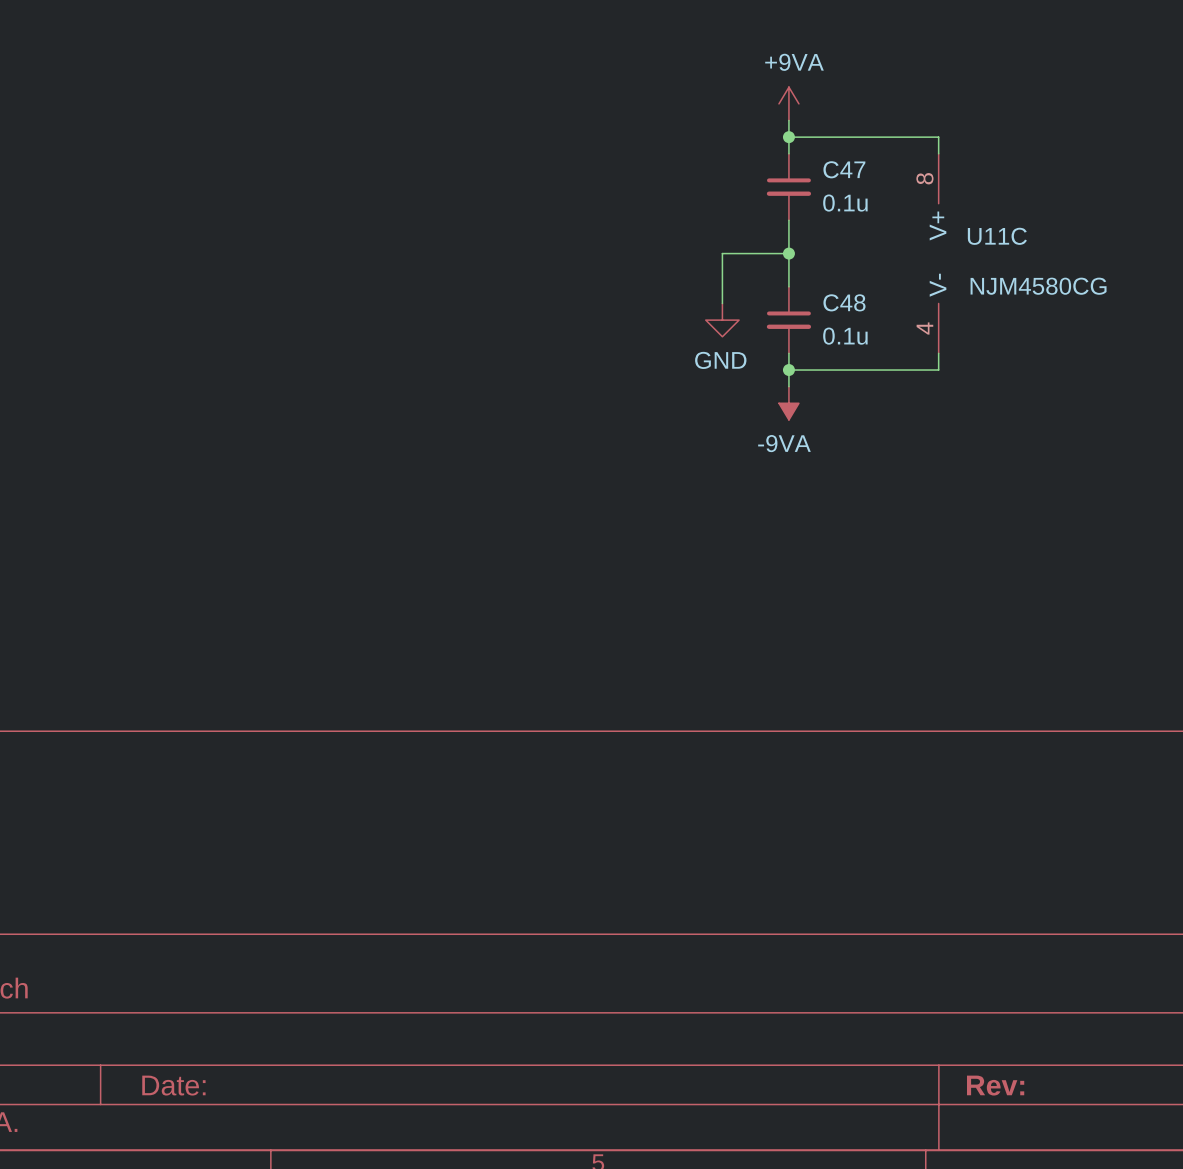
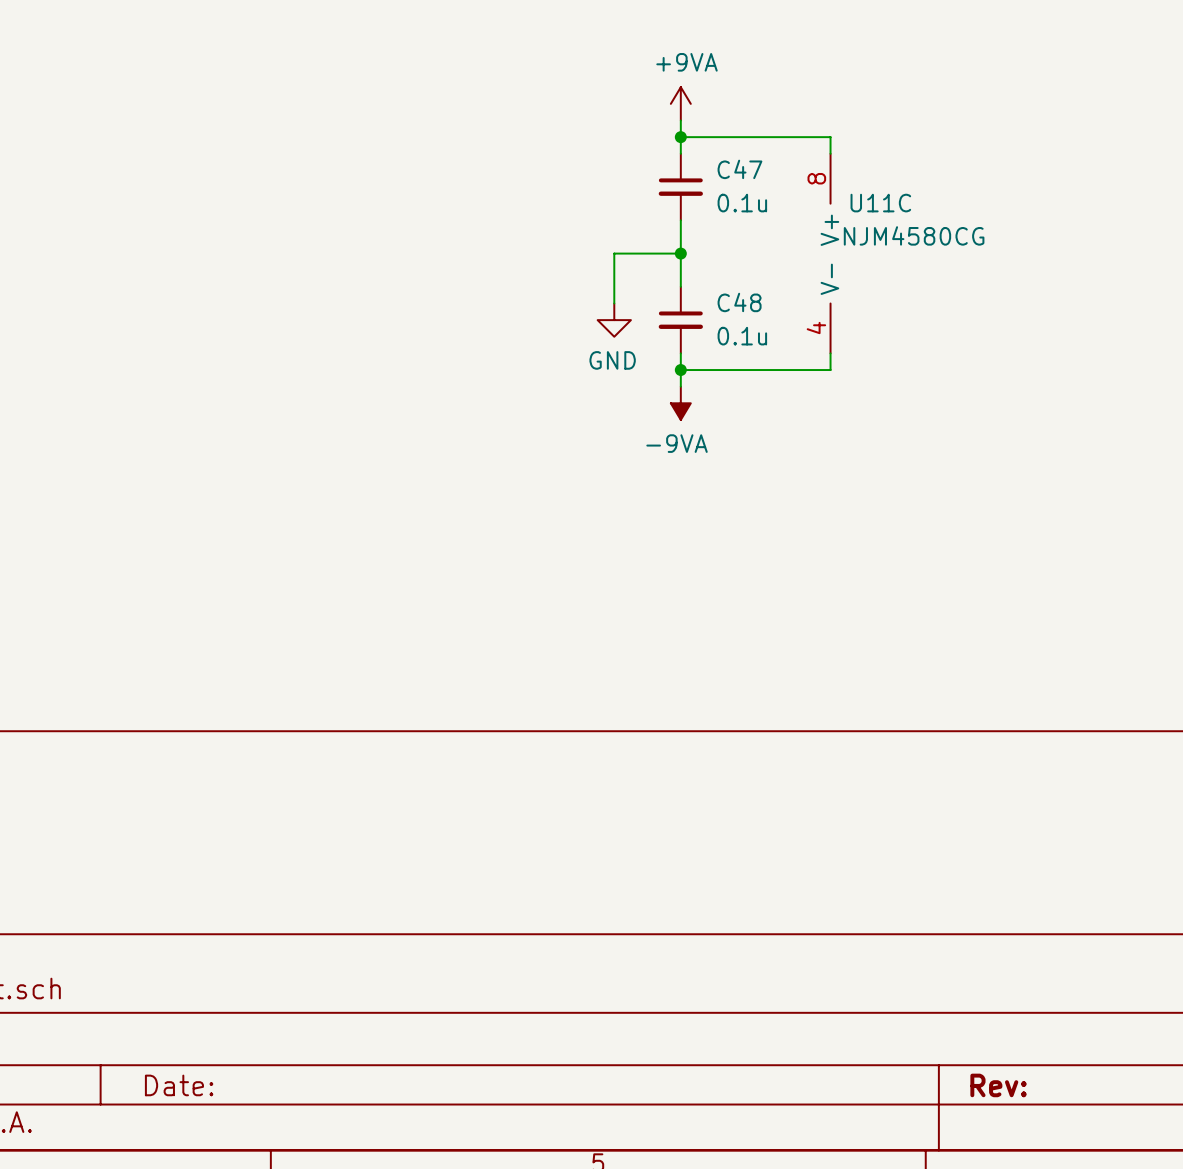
power symbol position: +9VA (788, 103) -> +9VA (680, 103)
wire: (788, 120) (788, 153) -> (680, 120) (680, 153)
wire: none -> (680, 137) (788, 137)
junction: none -> (680, 137)
junction: (788, 137) -> none
wire: (830, 137) (938, 137) (938, 153) -> (830, 137) (830, 153)
C47 position: (788, 187) -> (680, 187)
wire: (788, 220) (788, 286) -> (680, 220) (680, 286)
U11C name position: U11C (997, 236) -> U11C (880, 203)
junction: none -> (680, 253)
wire: (788, 253) (722, 253) (722, 303) -> (680, 253) (614, 253) (614, 303)
junction: (788, 253) -> none
U11C position: (938, 253) -> (830, 253)
U11C value position: NJM4580CG (1038, 286) -> NJM4580CG (914, 235)
power symbol position: GND (722, 320) -> GND (614, 320)
C48 position: (788, 320) -> (680, 320)
wire: (788, 353) (788, 386) -> (680, 353) (680, 386)
wire: (938, 353) (938, 370) (830, 370) -> (830, 353) (830, 370)
wire: none -> (680, 370) (788, 370)
junction: none -> (680, 370)
junction: (788, 370) -> none
power symbol position: -9VA (788, 403) -> -9VA (680, 403)

